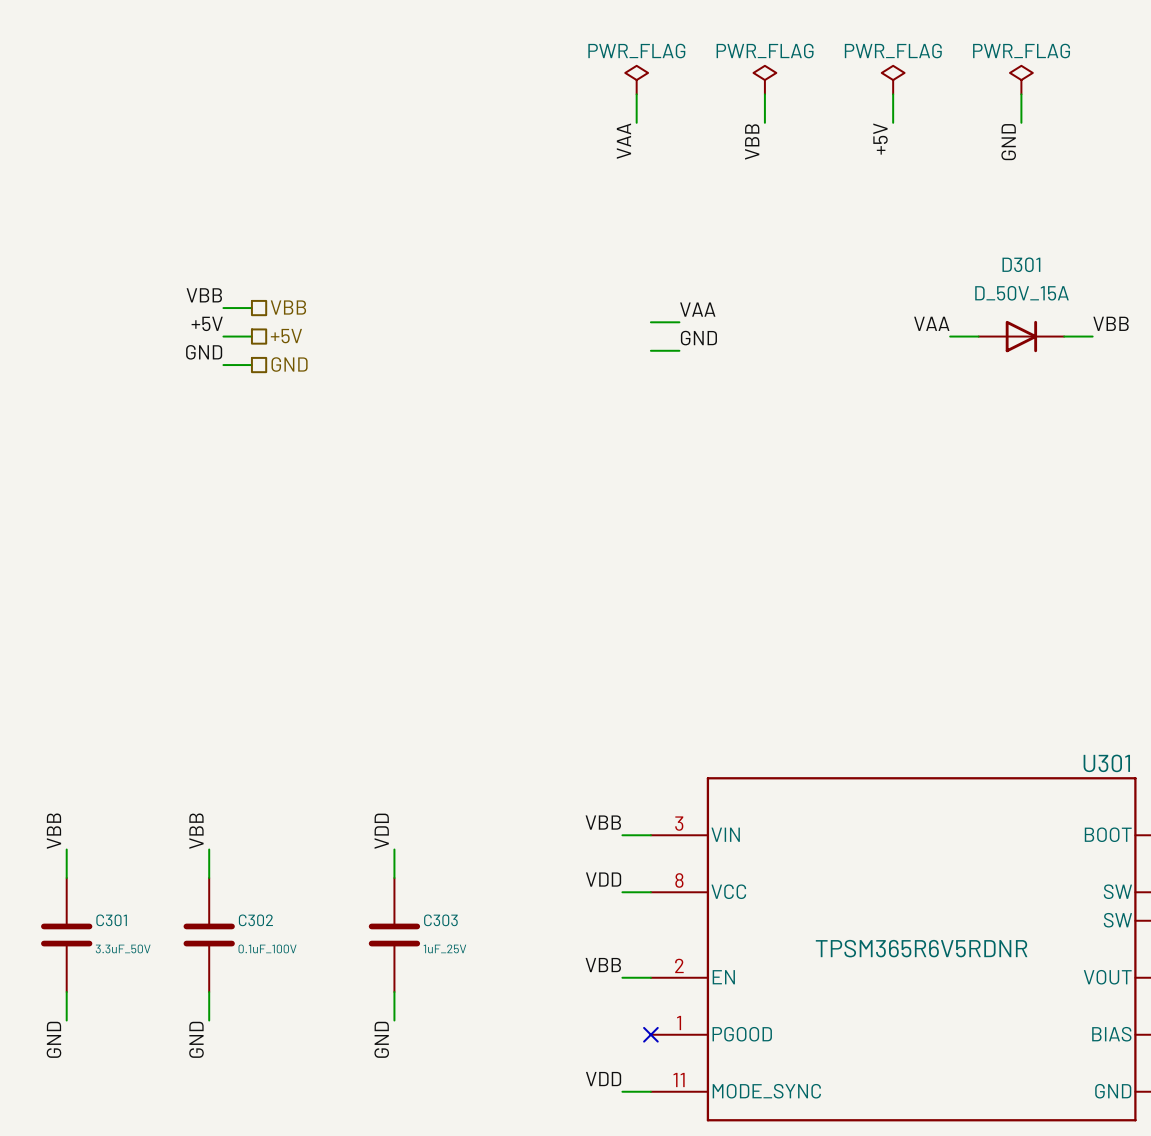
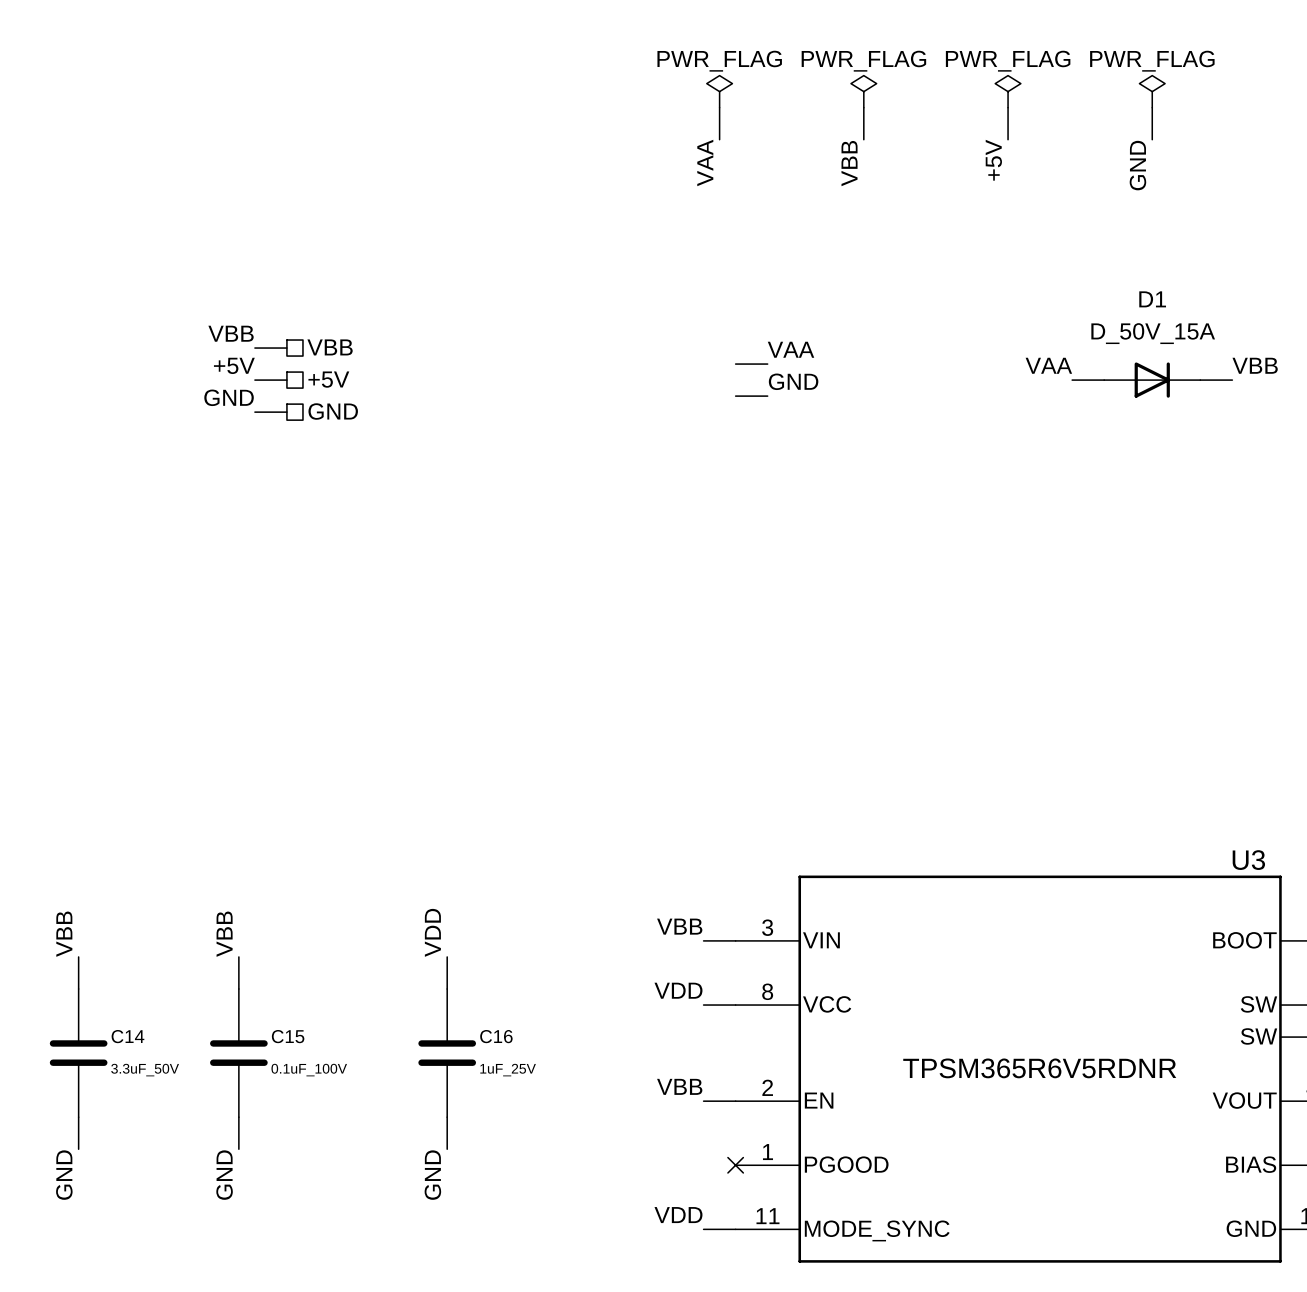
D301 name: D301 (1021, 264) -> D1 (1152, 299)
U301 name: U301 (1106, 763) -> U3 (1248, 860)
C301 name: C301 (111, 920) -> C14 (127, 1036)
C302 name: C302 (255, 920) -> C15 (288, 1036)
C303 name: C303 (440, 920) -> C16 (496, 1036)

